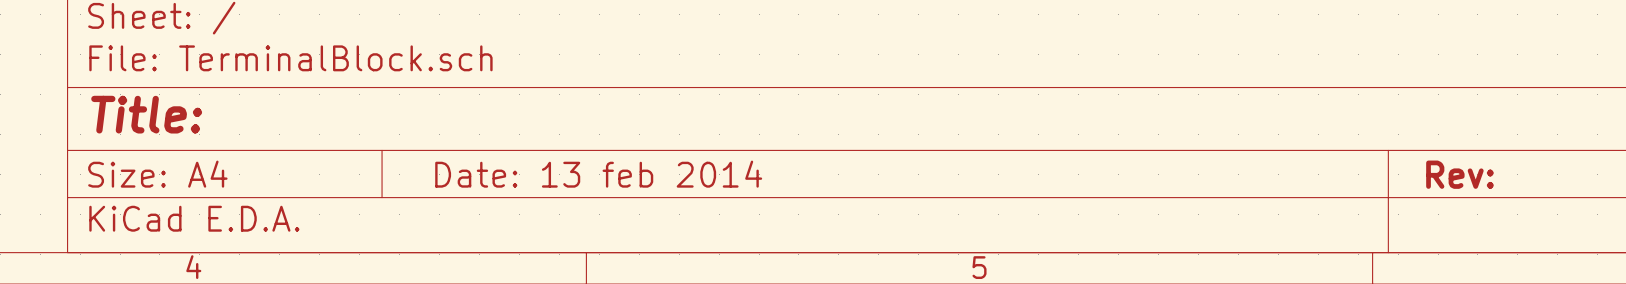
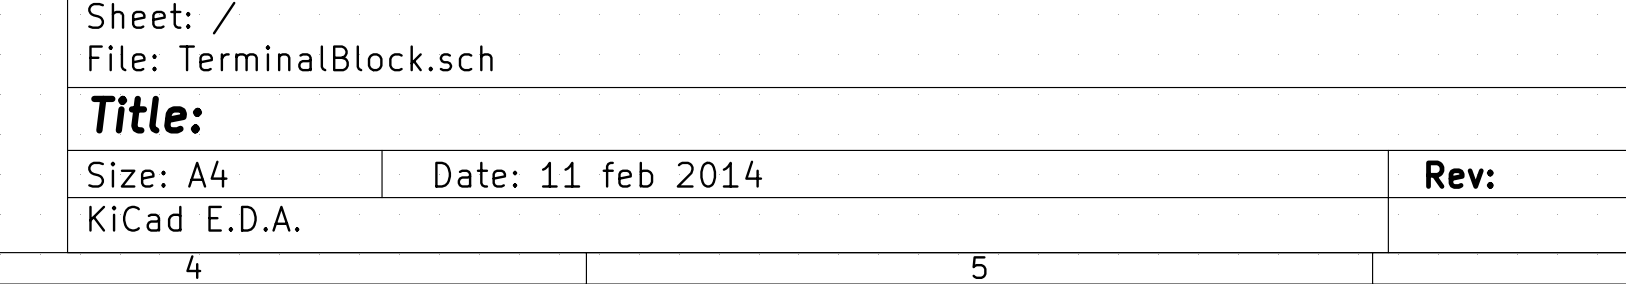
title block: Date: 13 feb 2014 (598, 174) -> Date: 11 feb 2014 (598, 174)

